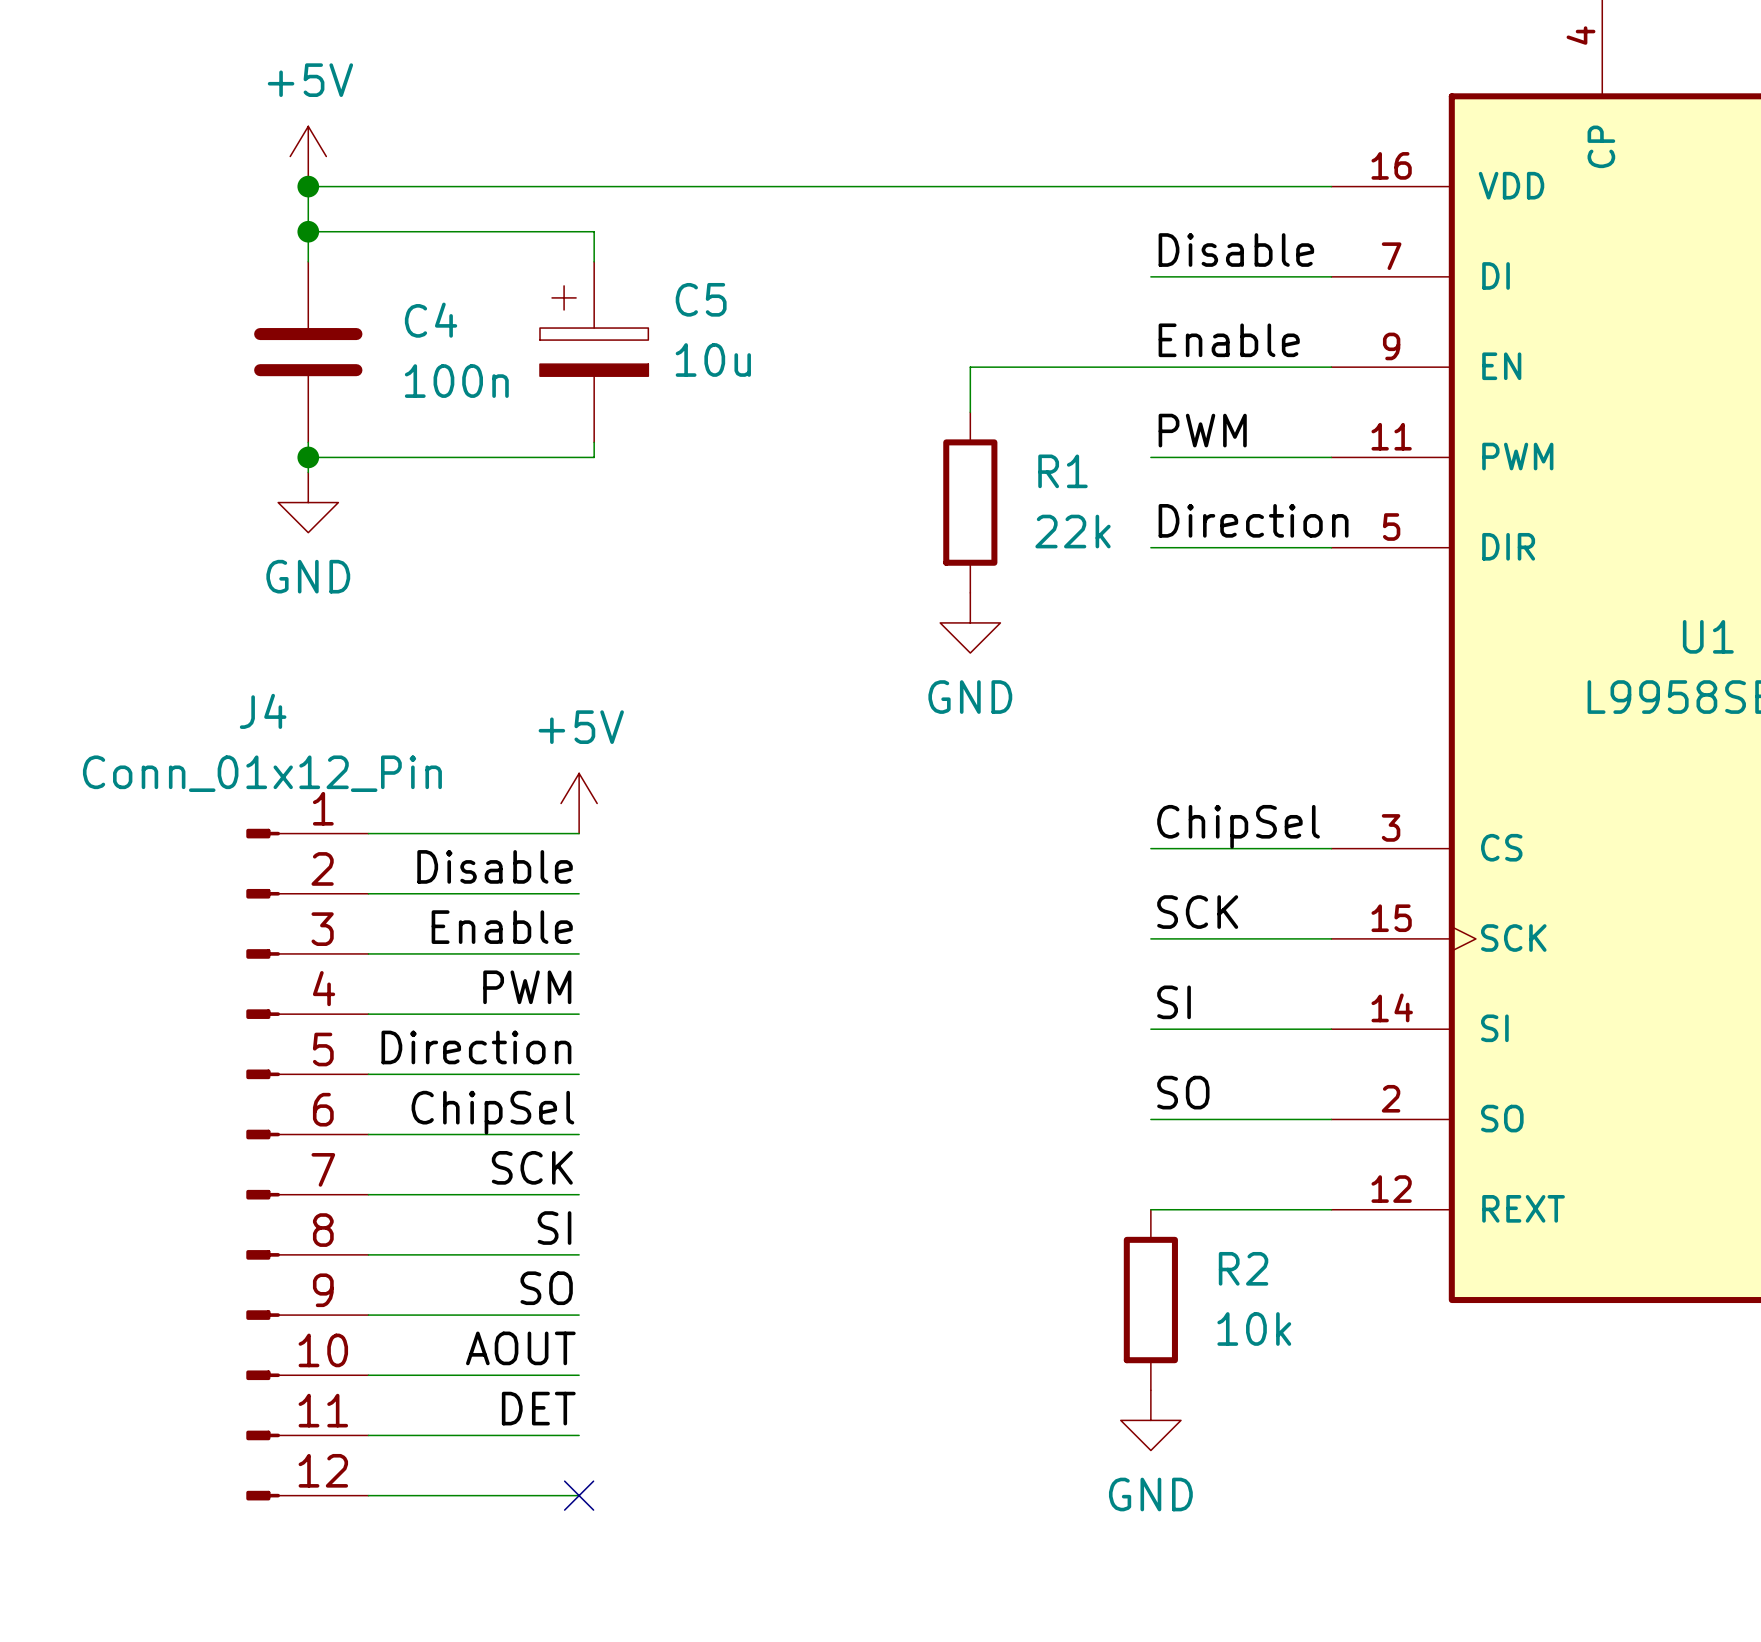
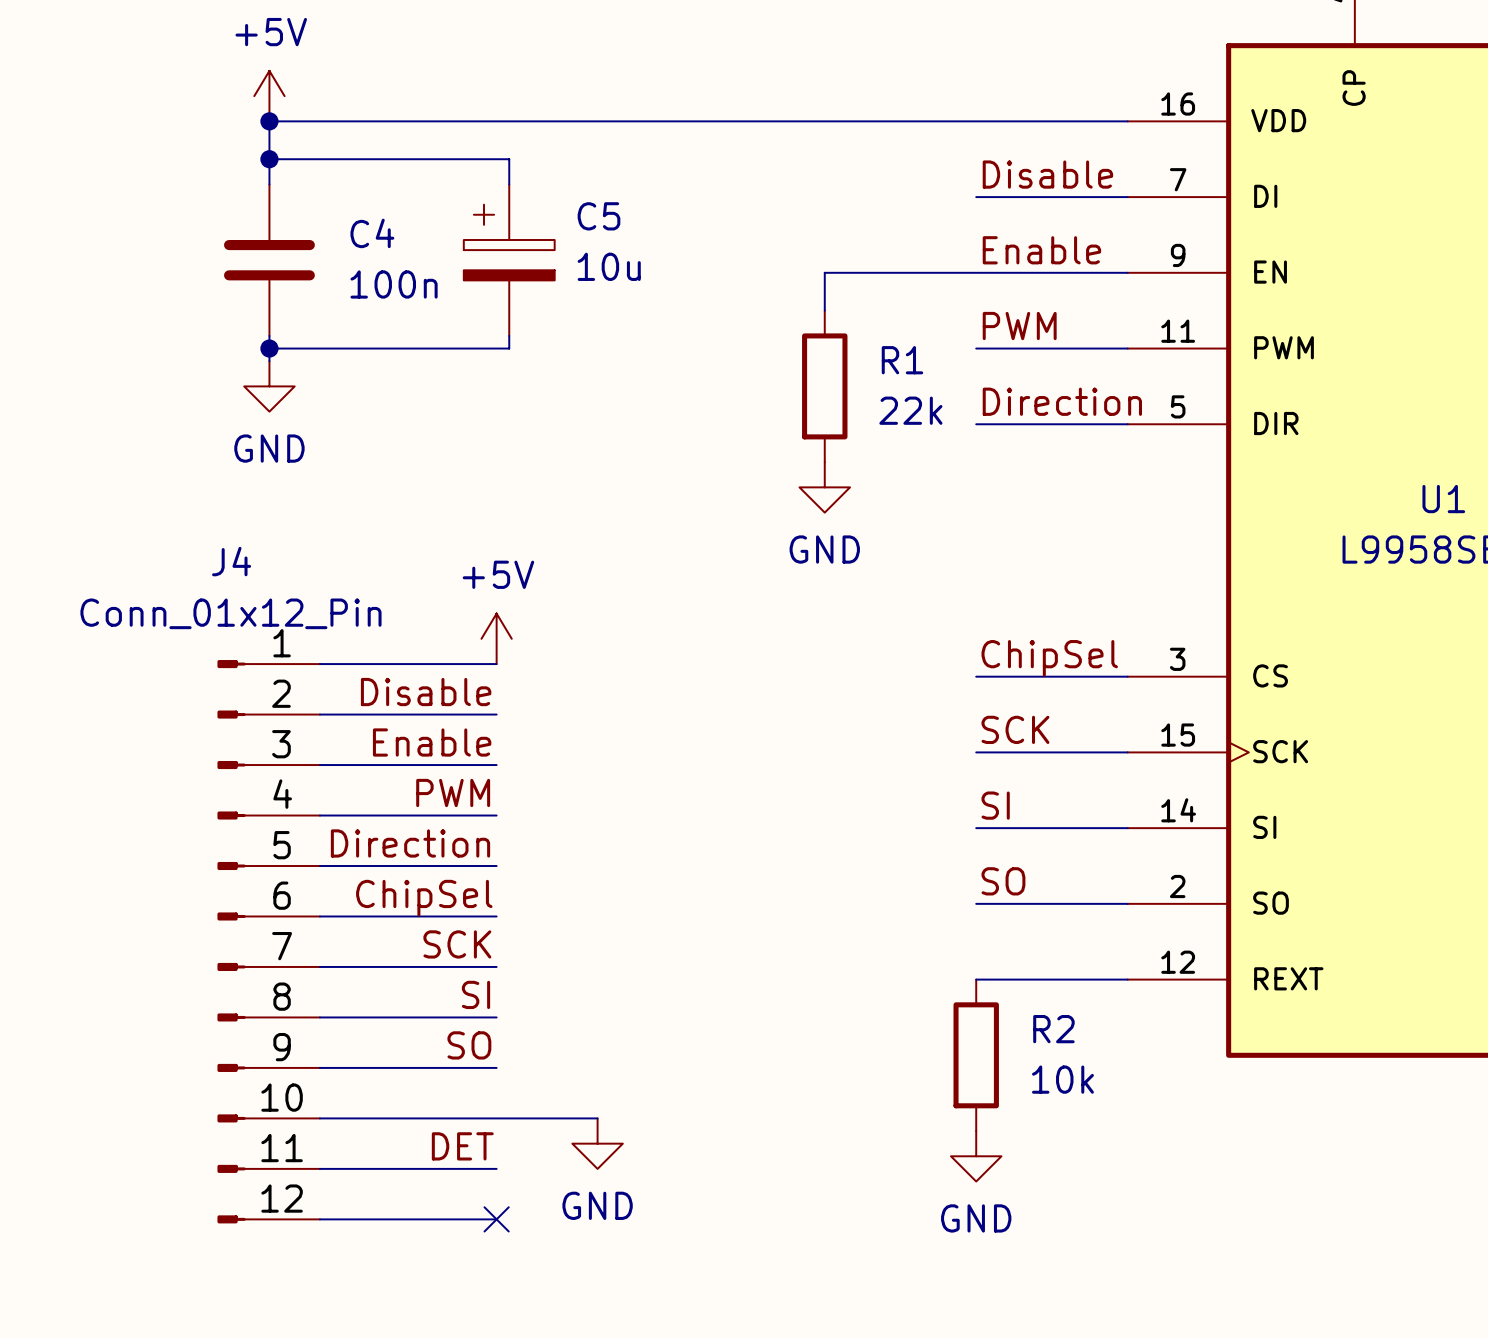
label: AOUT (520, 1348) -> none
wire: none -> (496, 1118) (597, 1118)
power symbol: none -> GND (597, 1143)

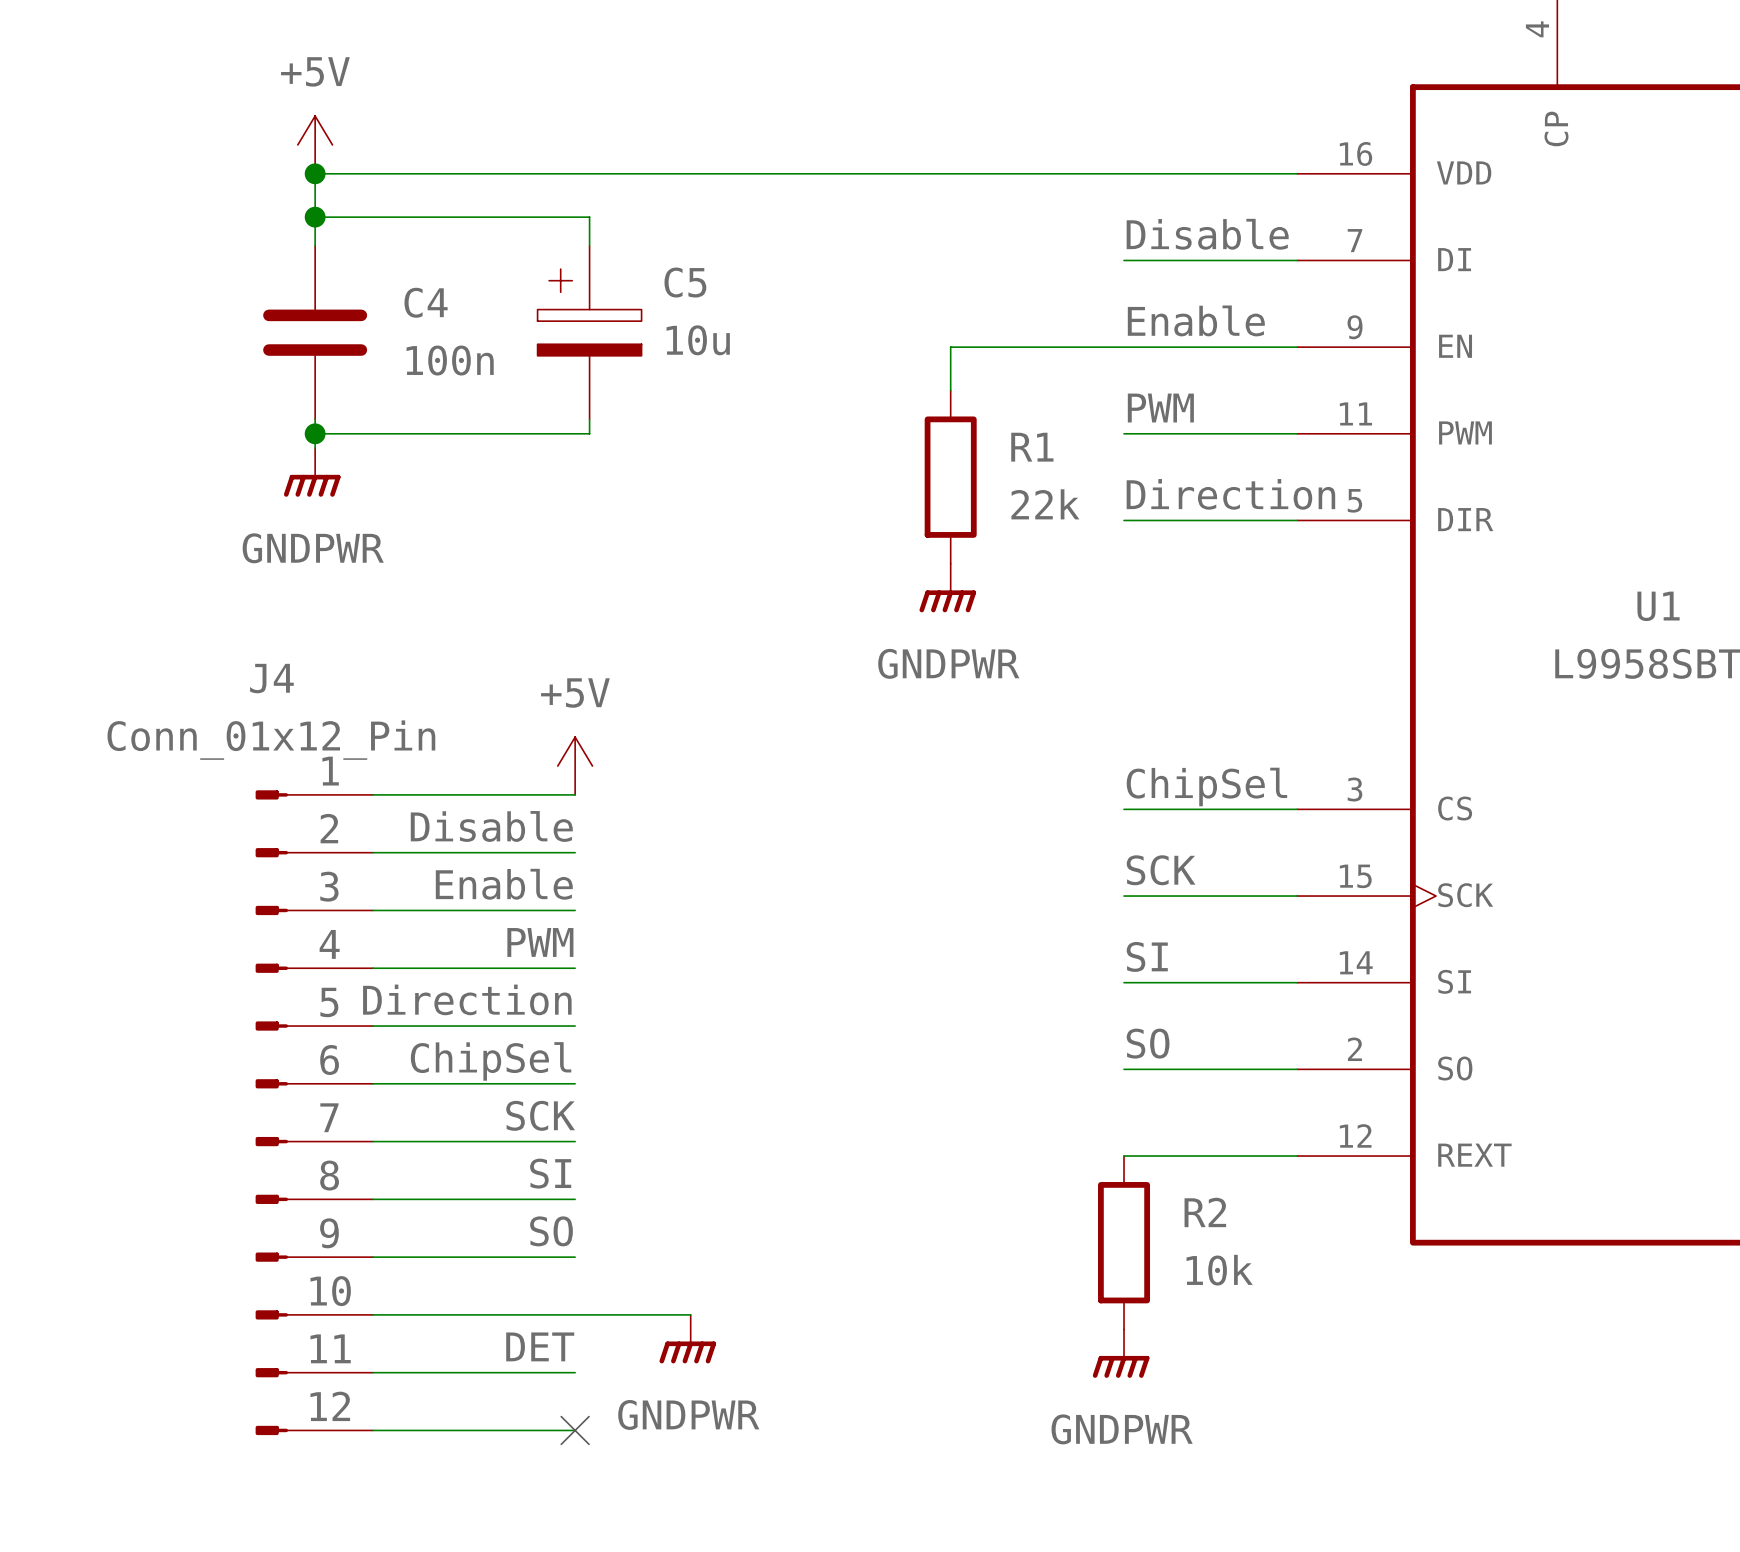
power symbol: GND (269, 386) -> GNDPWR (312, 472)
power symbol: GND (824, 487) -> GNDPWR (947, 588)
power symbol: GND (597, 1143) -> GNDPWR (687, 1339)
power symbol: GND (976, 1156) -> GNDPWR (1121, 1353)

